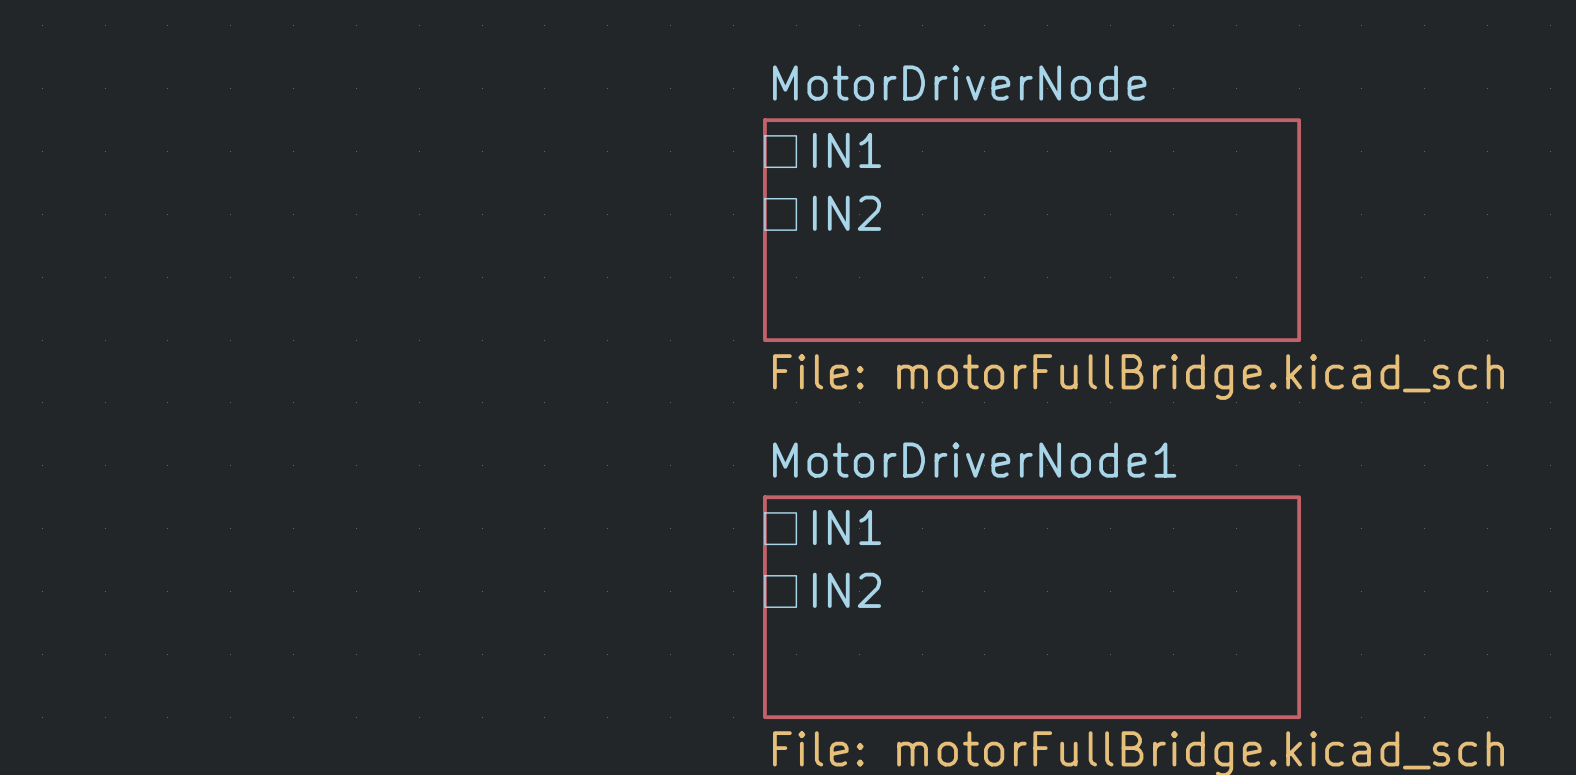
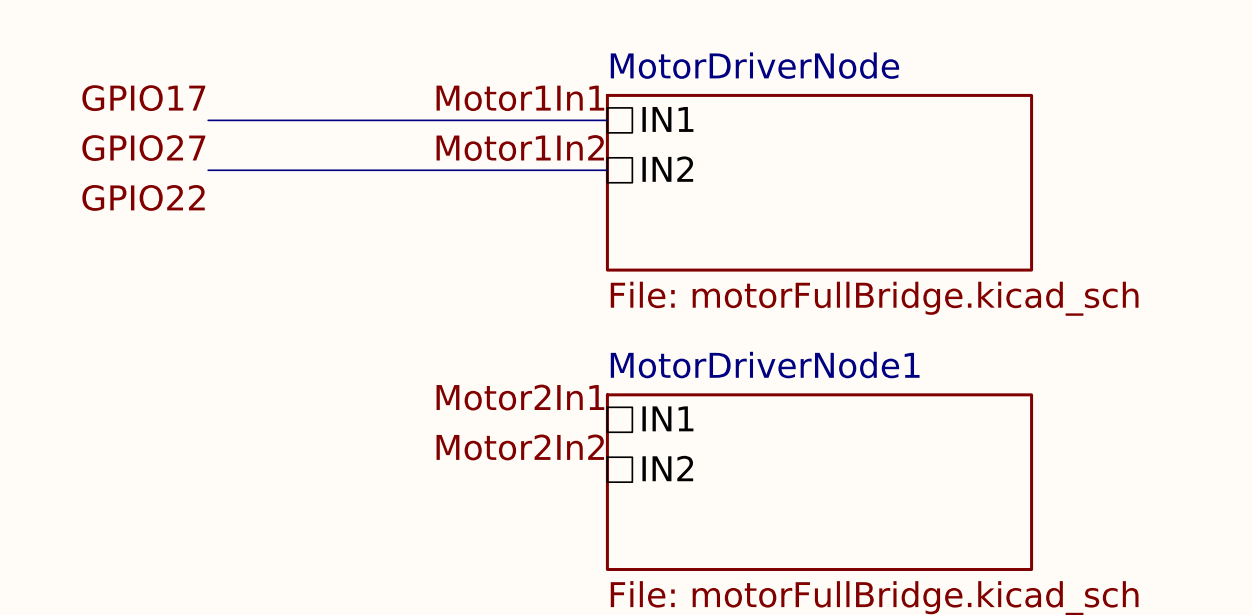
label: none -> GPIO17 (143, 98)
label: none -> Motor1In1 (520, 98)
wire: none -> (208, 120) (607, 120)
label: none -> GPIO27 (143, 148)
label: none -> Motor1In2 (520, 148)
wire: none -> (208, 170) (607, 170)
label: none -> GPIO22 (143, 197)
label: none -> Motor2In1 (520, 397)
label: none -> Motor2In2 (520, 447)

